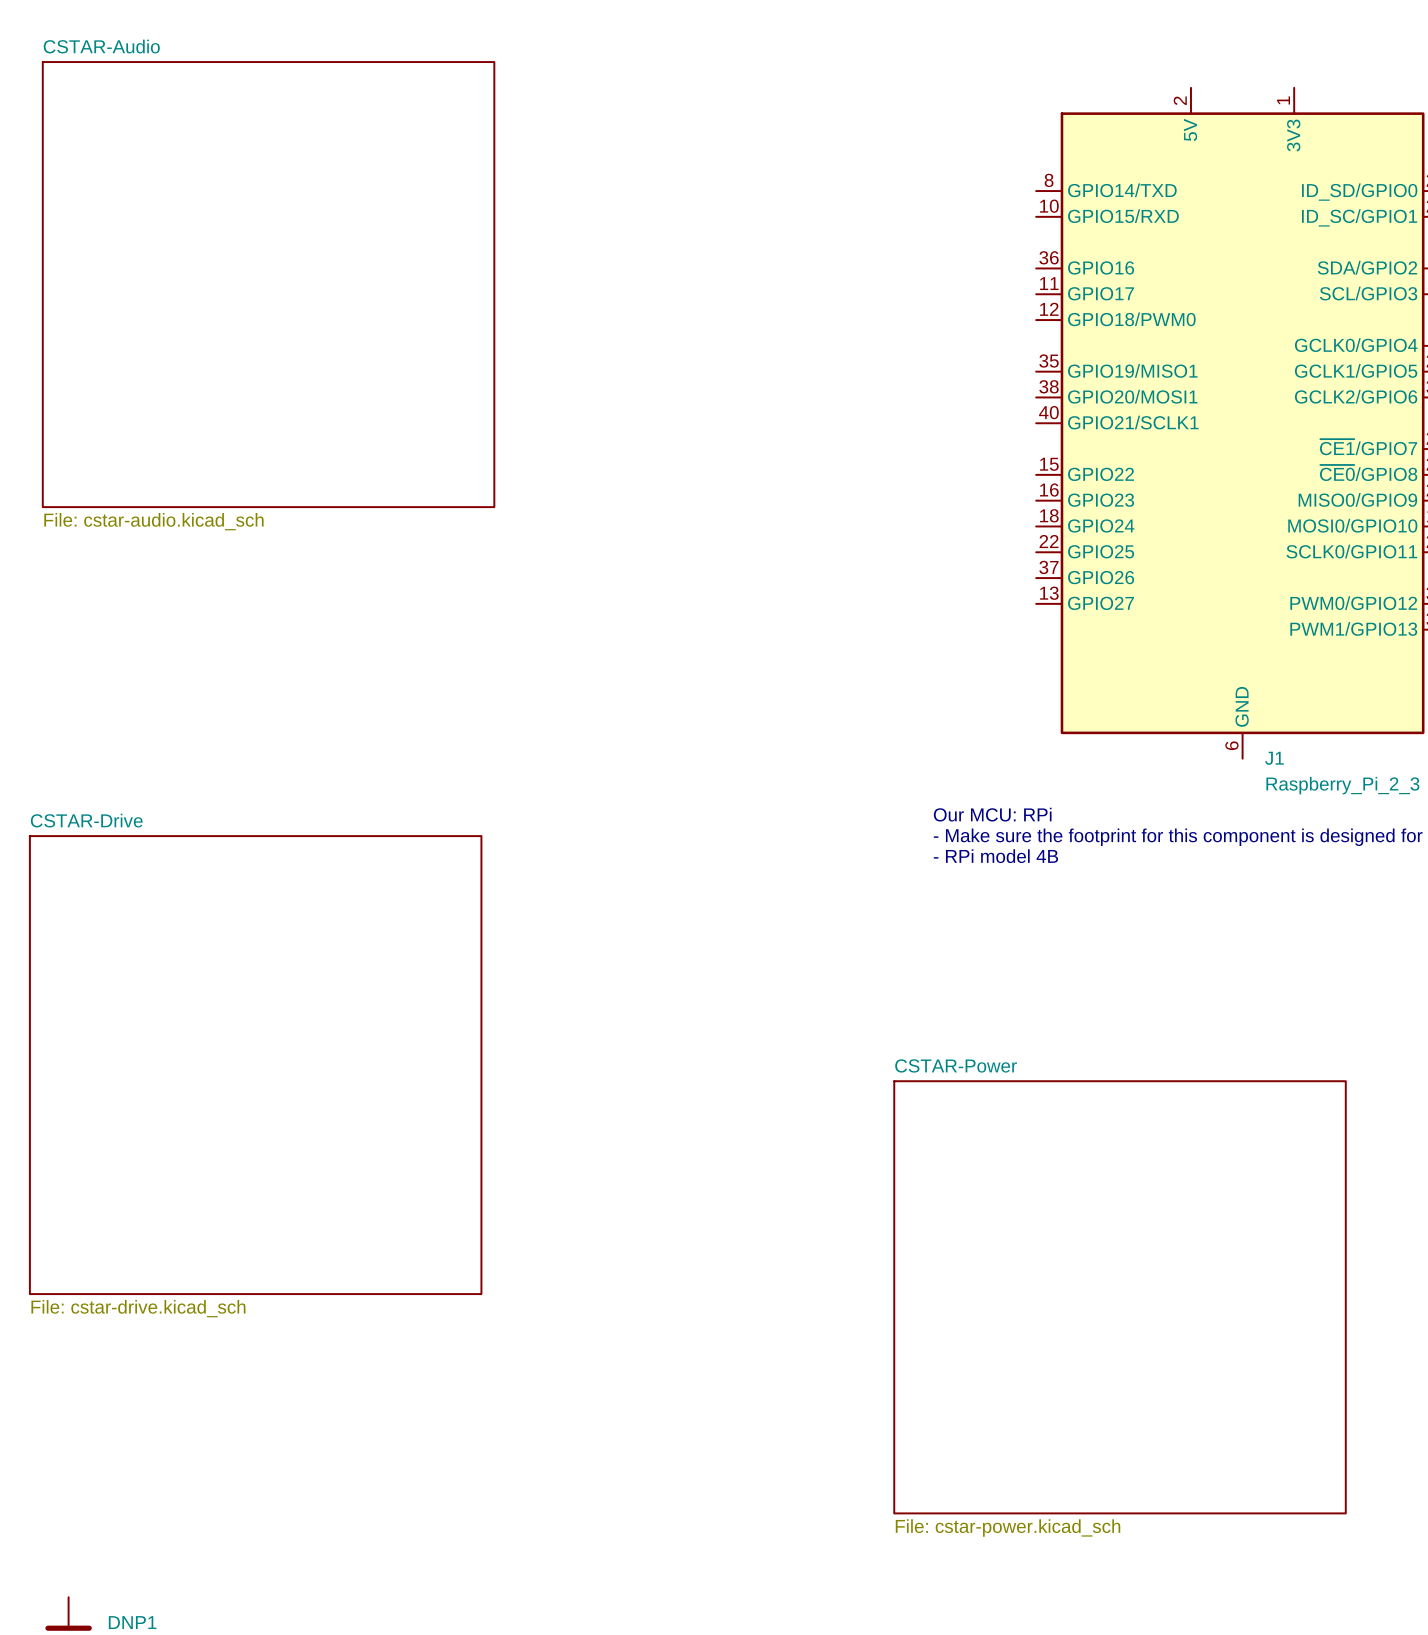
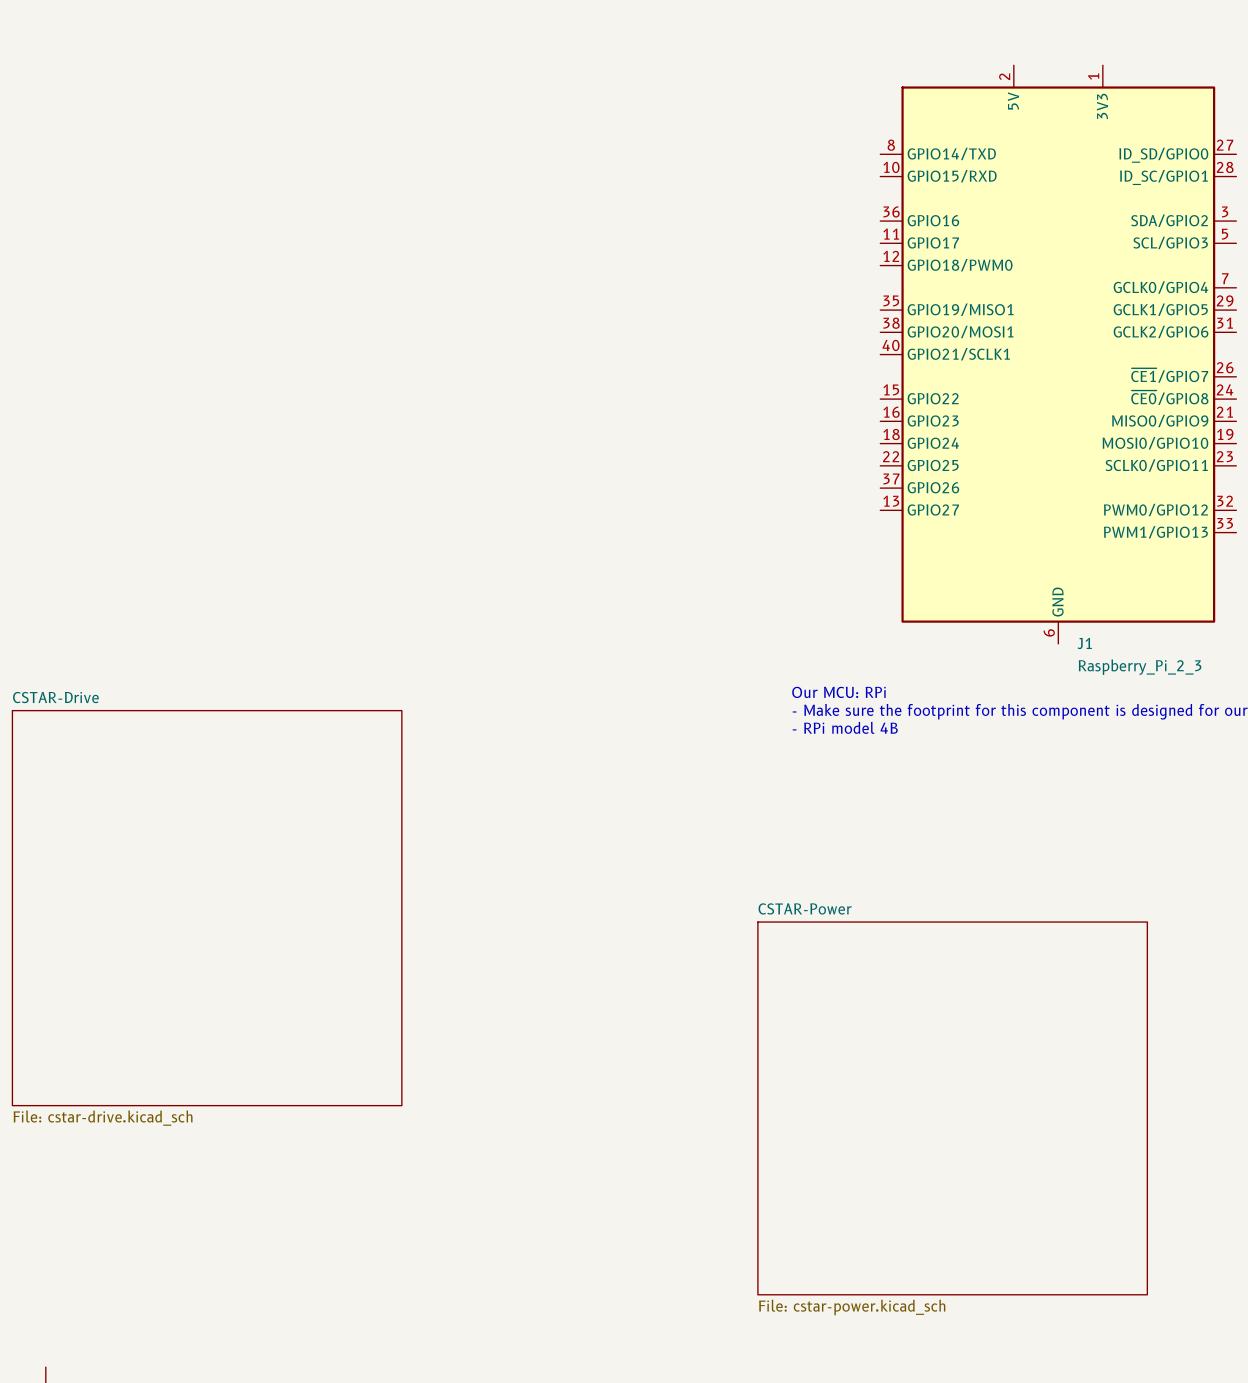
sheet CSTAR-Audio: File: cstar-audio.kicad_sch (268, 284) -> none

